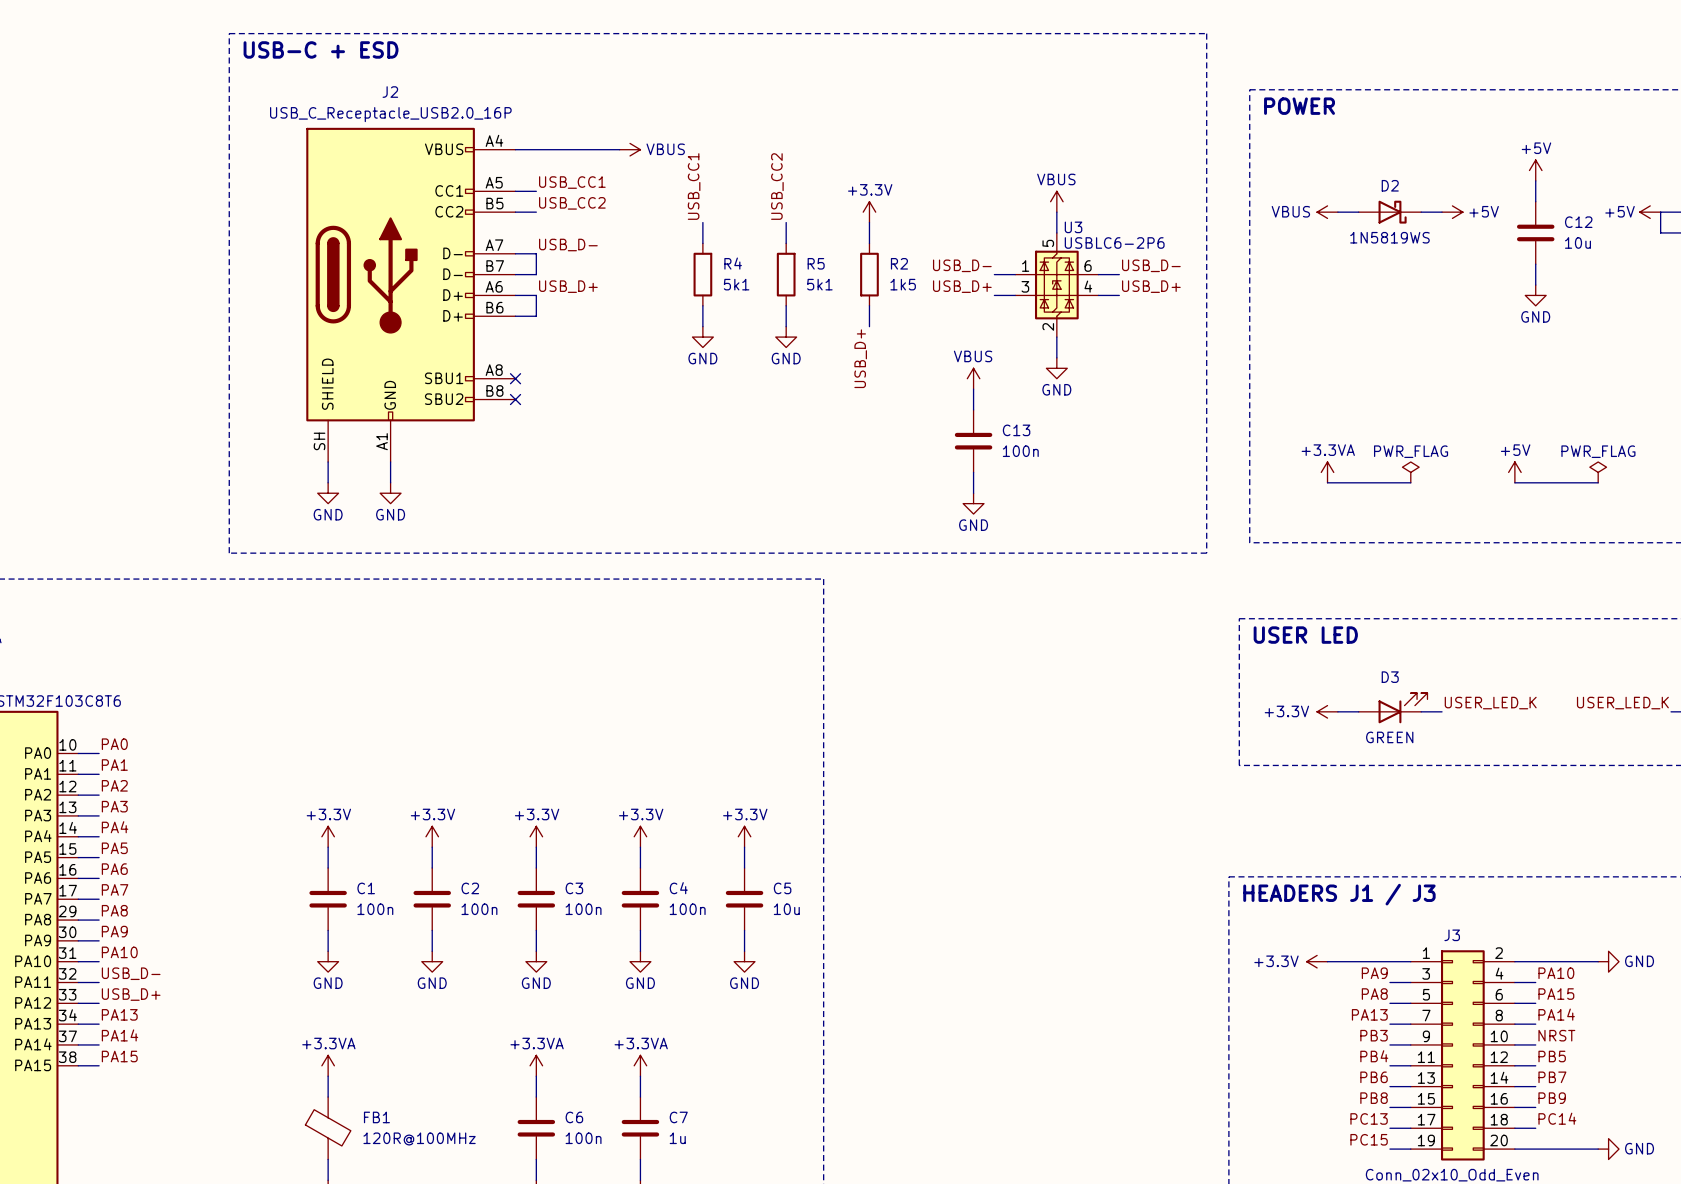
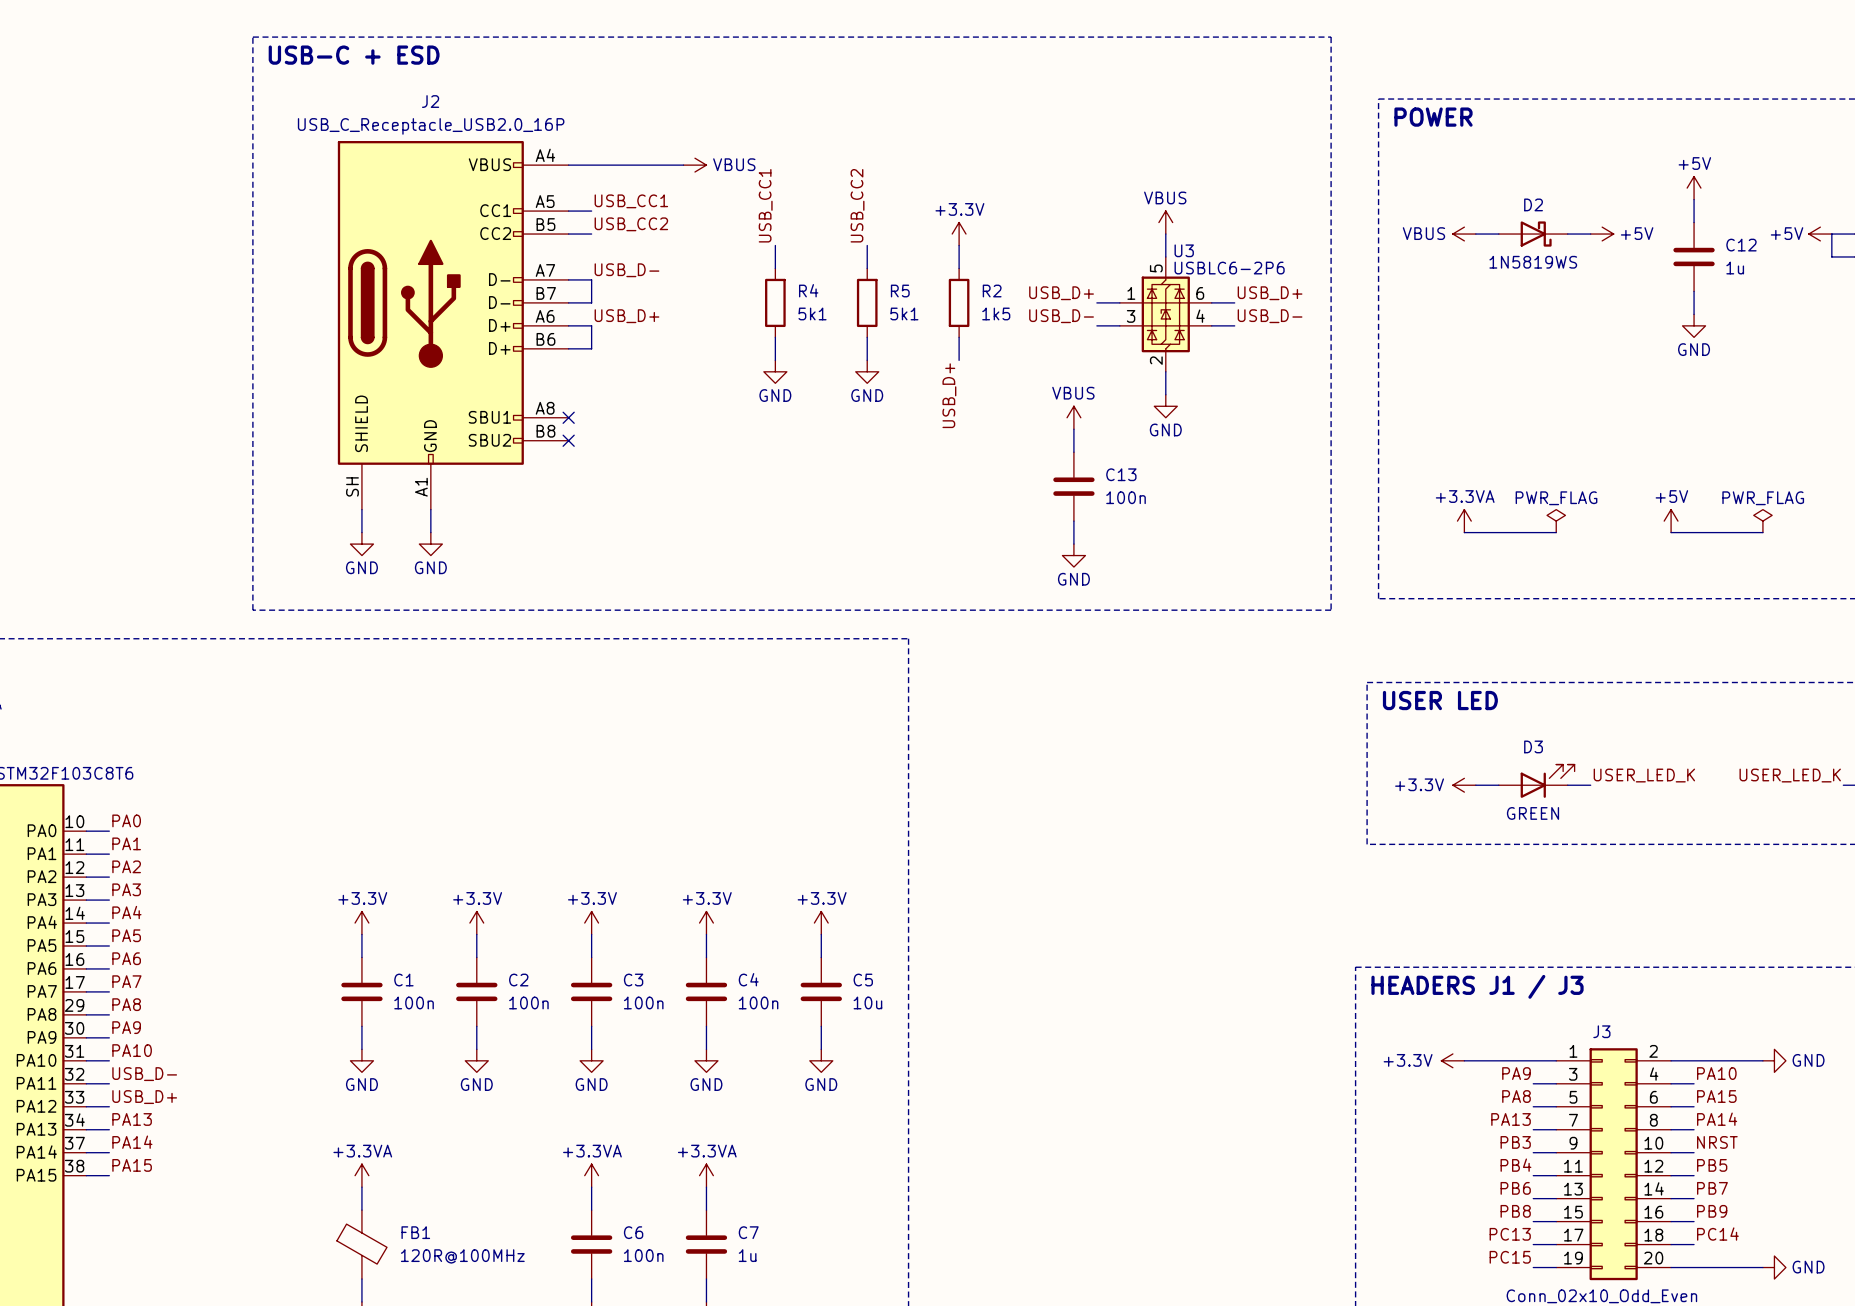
C12 value: 10u (1577, 242) -> 1u (1735, 268)
label: USB_D- (962, 265) -> USB_D+ (1061, 293)
label: USB_D- (1151, 265) -> USB_D+ (1270, 293)
label: USB_D+ (962, 286) -> USB_D- (1061, 316)
label: USB_D+ (1151, 286) -> USB_D- (1270, 316)

